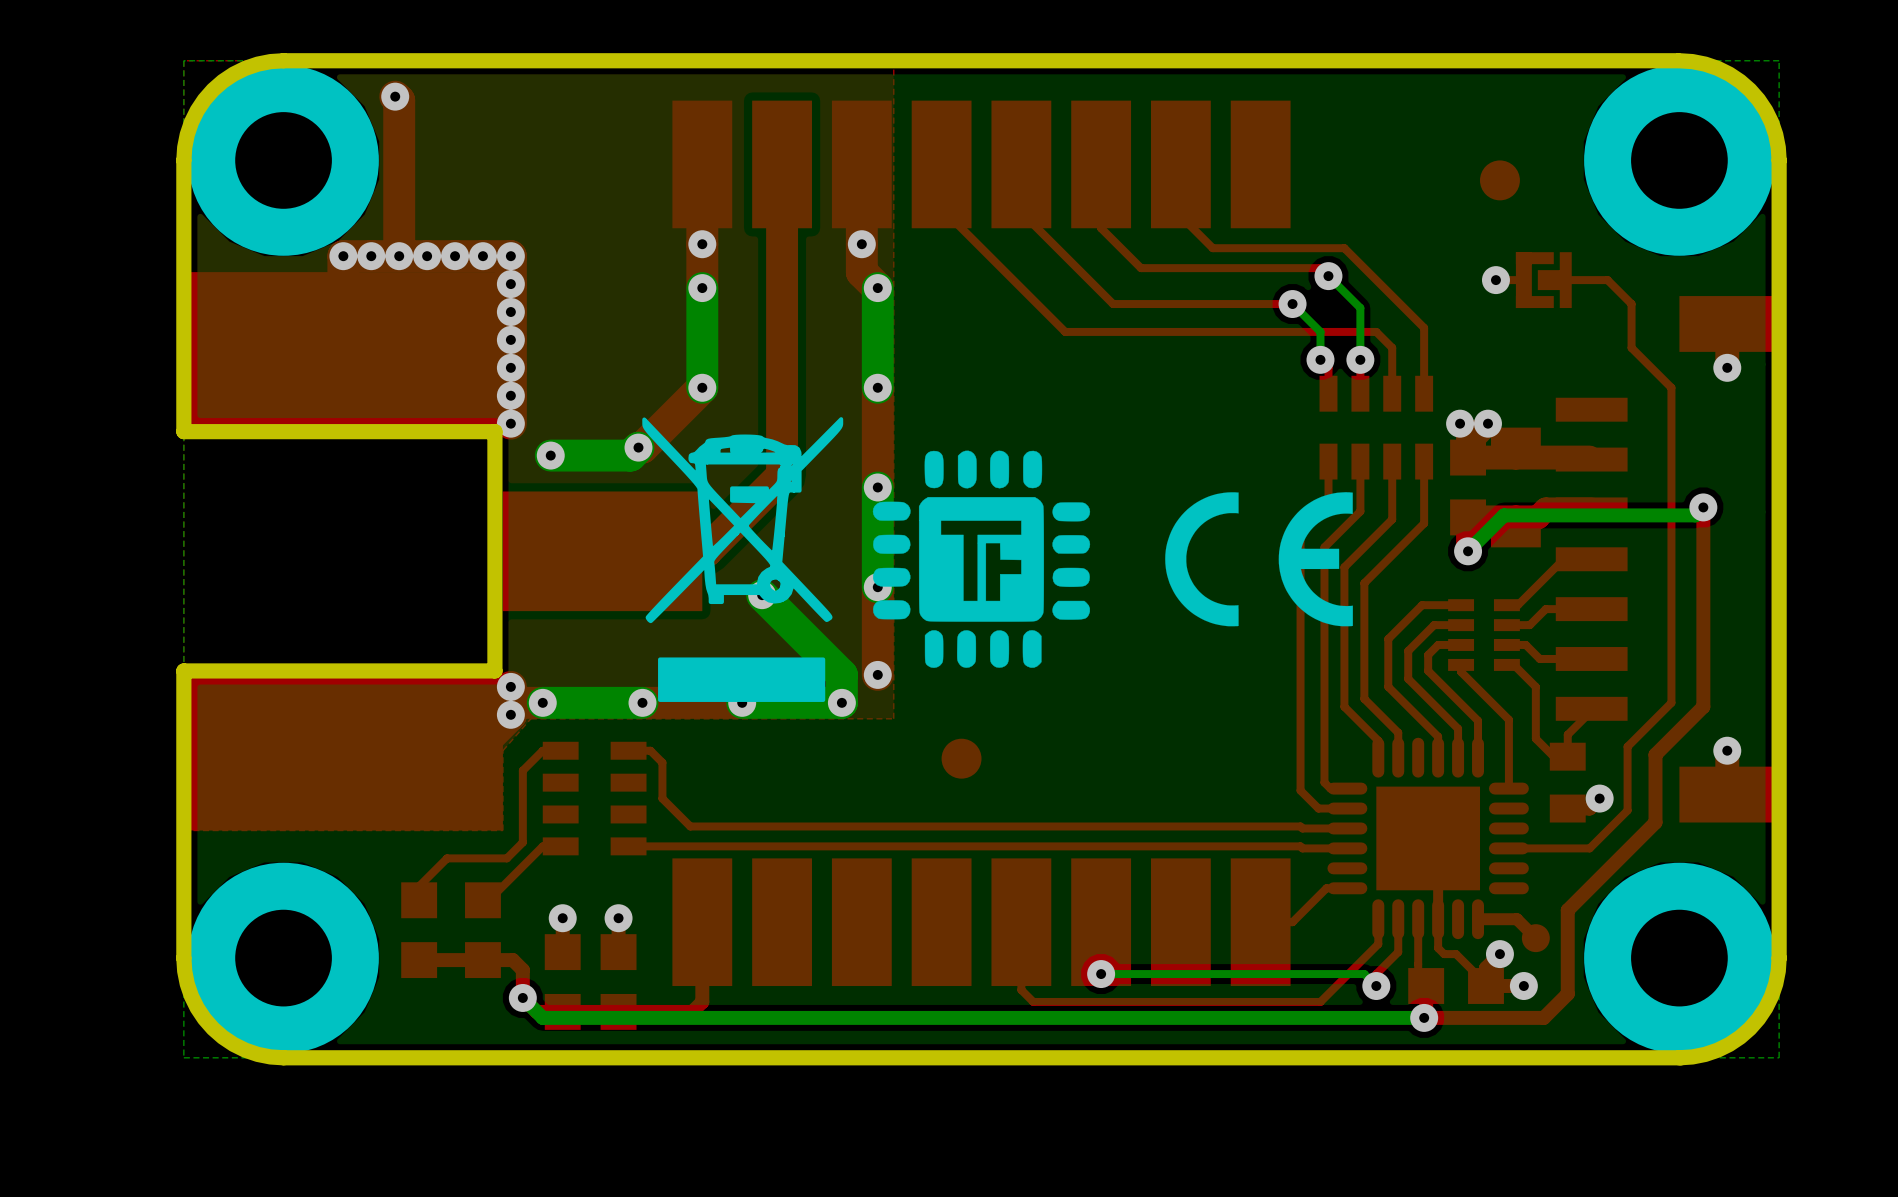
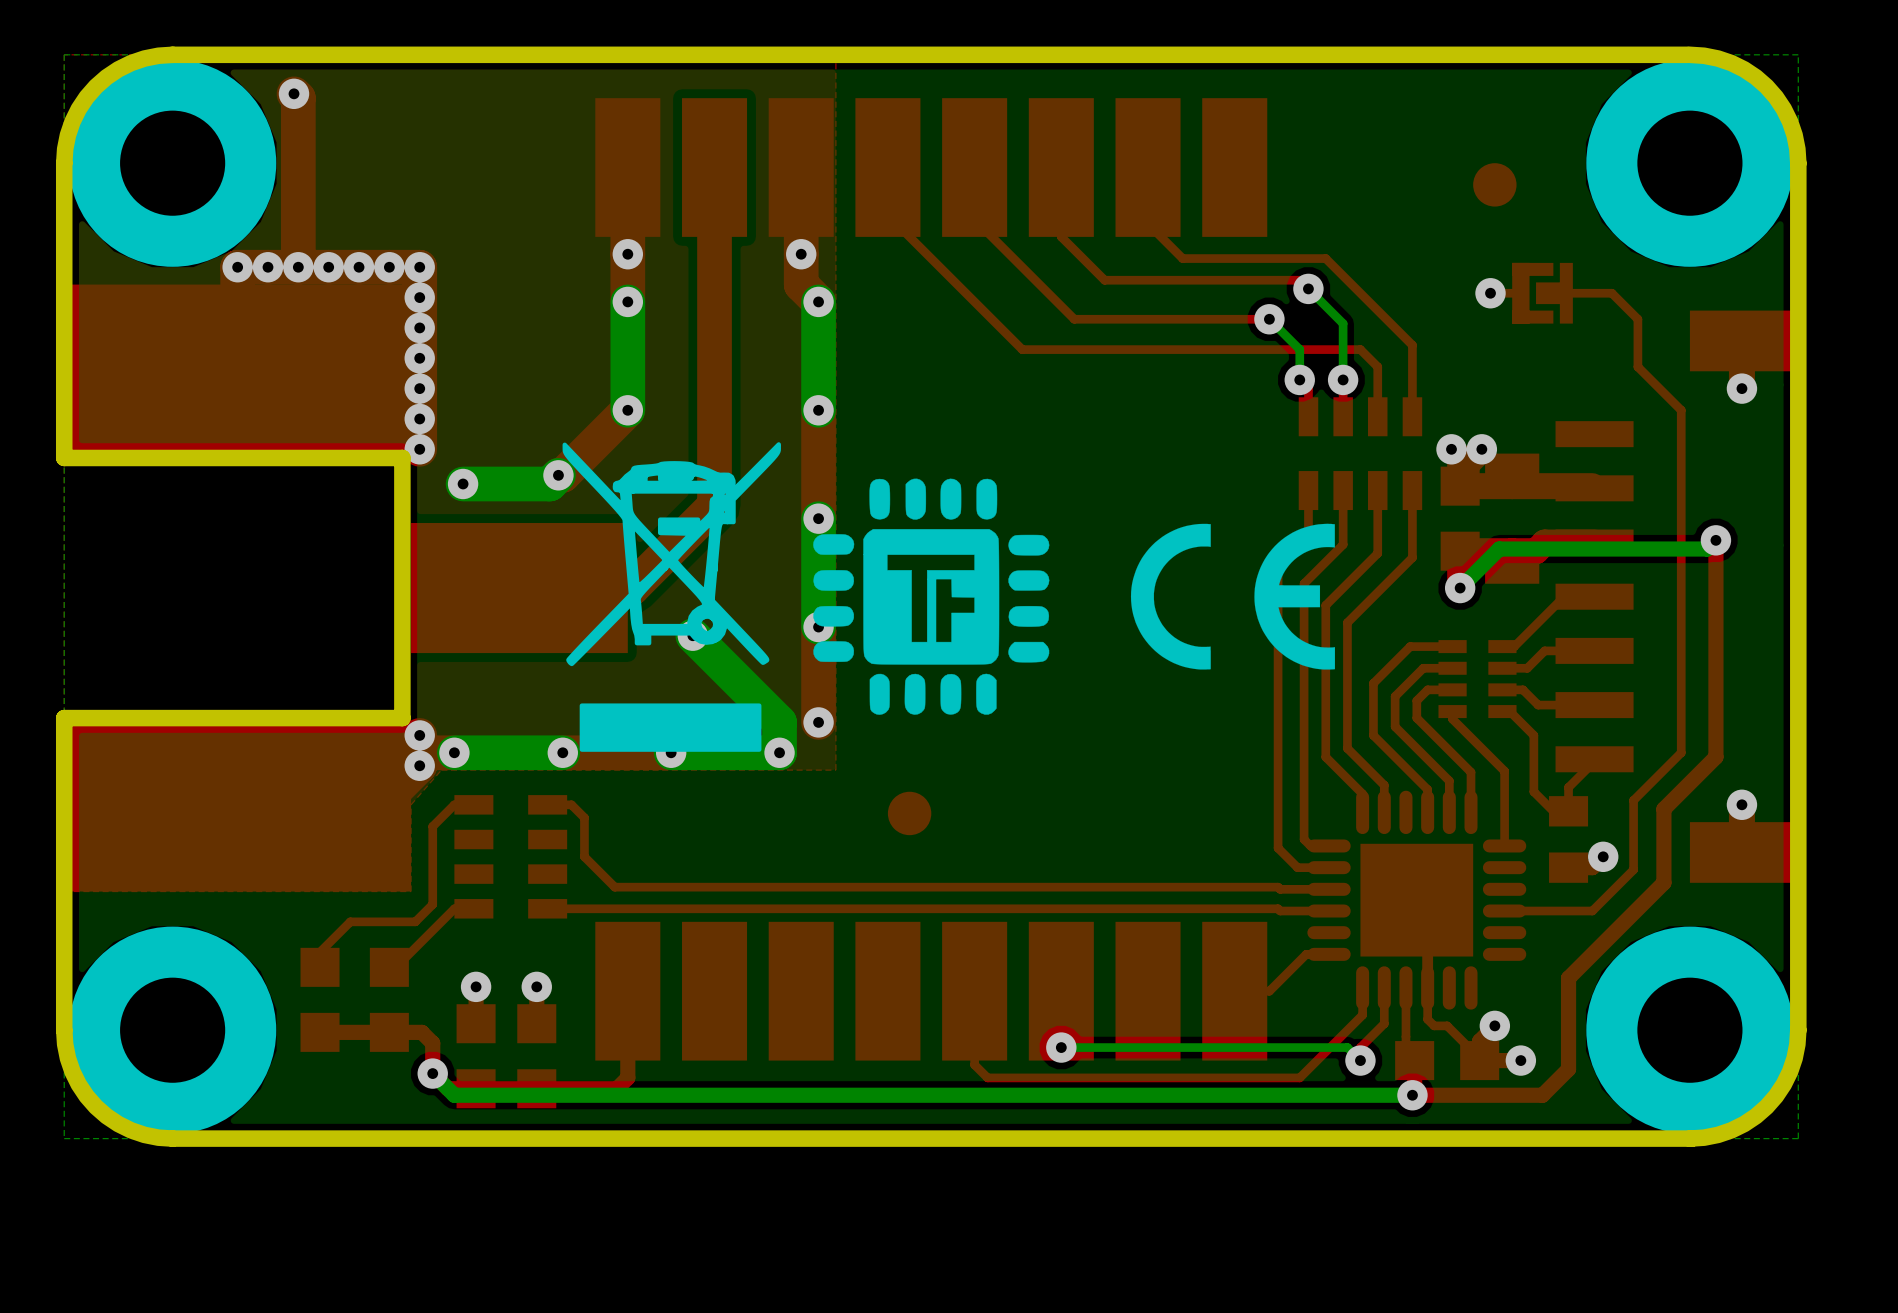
top track: (1478, 919) (1516, 919) (1535, 938) -> none
part: (1535, 938) -> none

